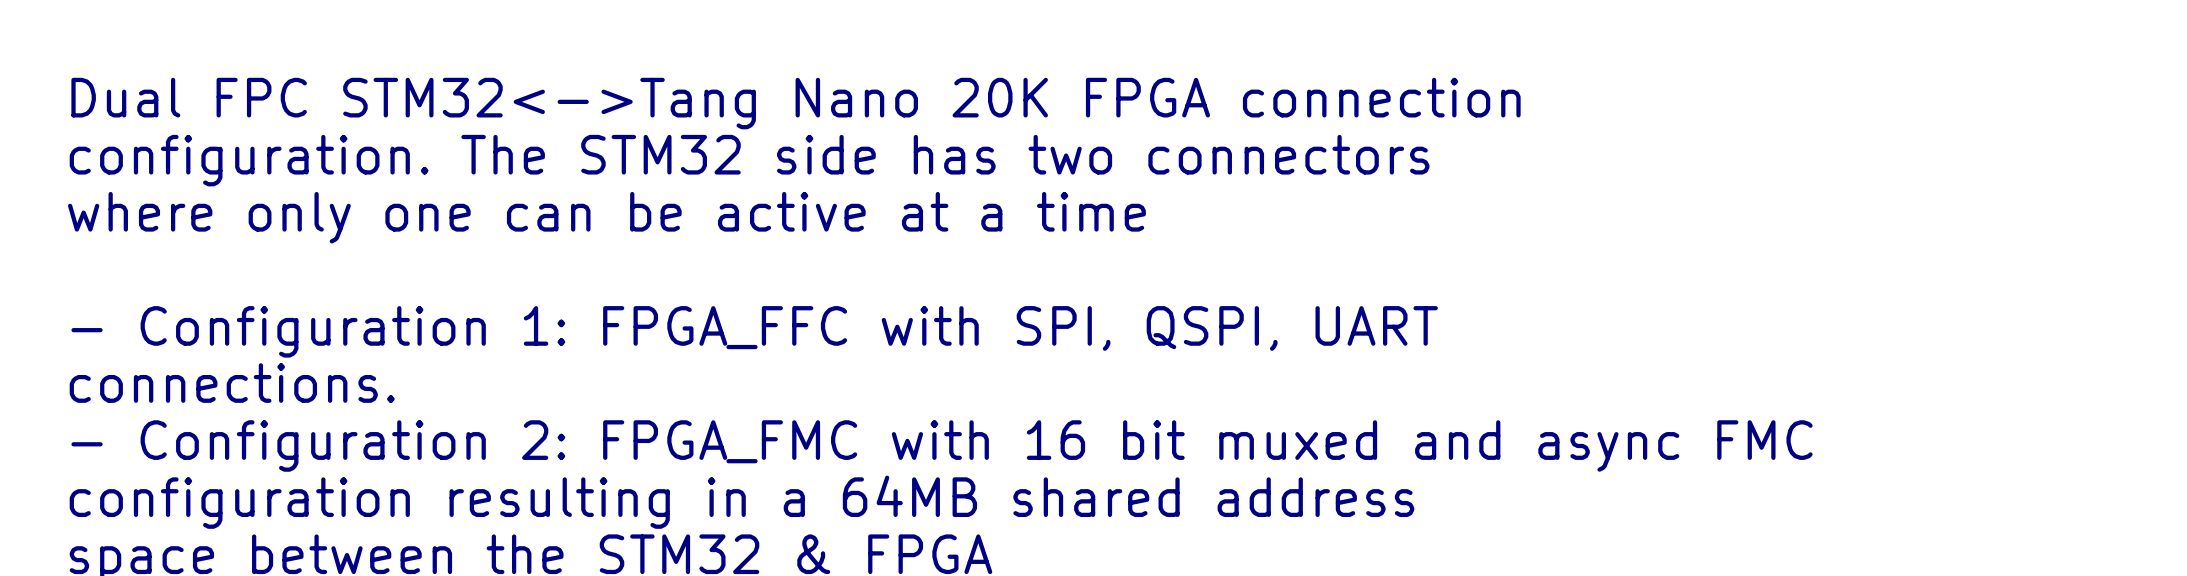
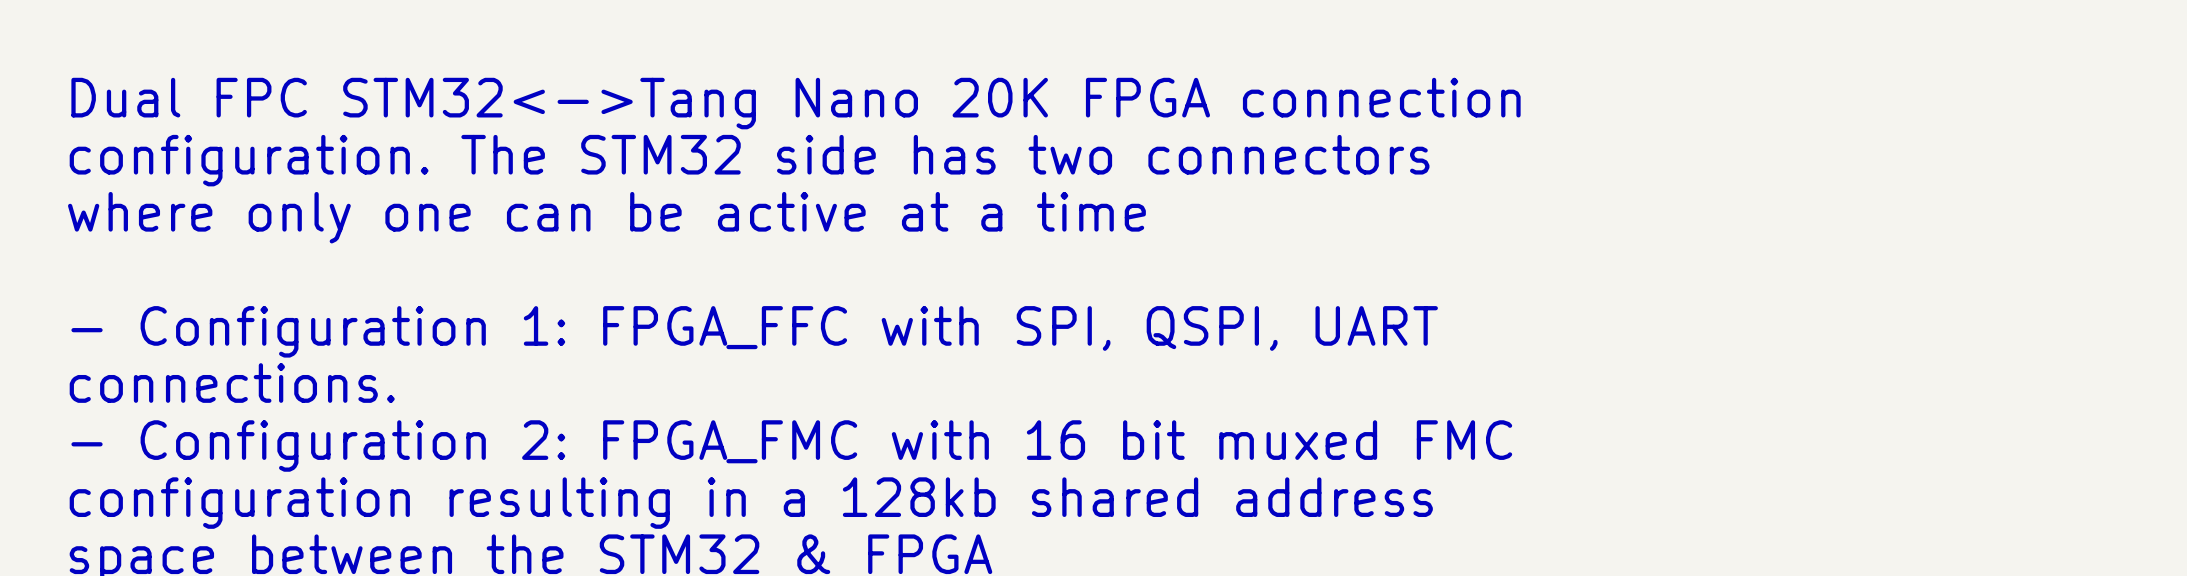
text: - Configuration 2: FPGA_FMC with 16 bit muxed and async FMC (942, 445) -> - Configuration 2: FPGA_FMC with 16 bit muxed FMC (791, 445)
text: configuration resulting in a 64MB shared address (741, 502) -> configuration resulting in a 128kb shared address (751, 503)

